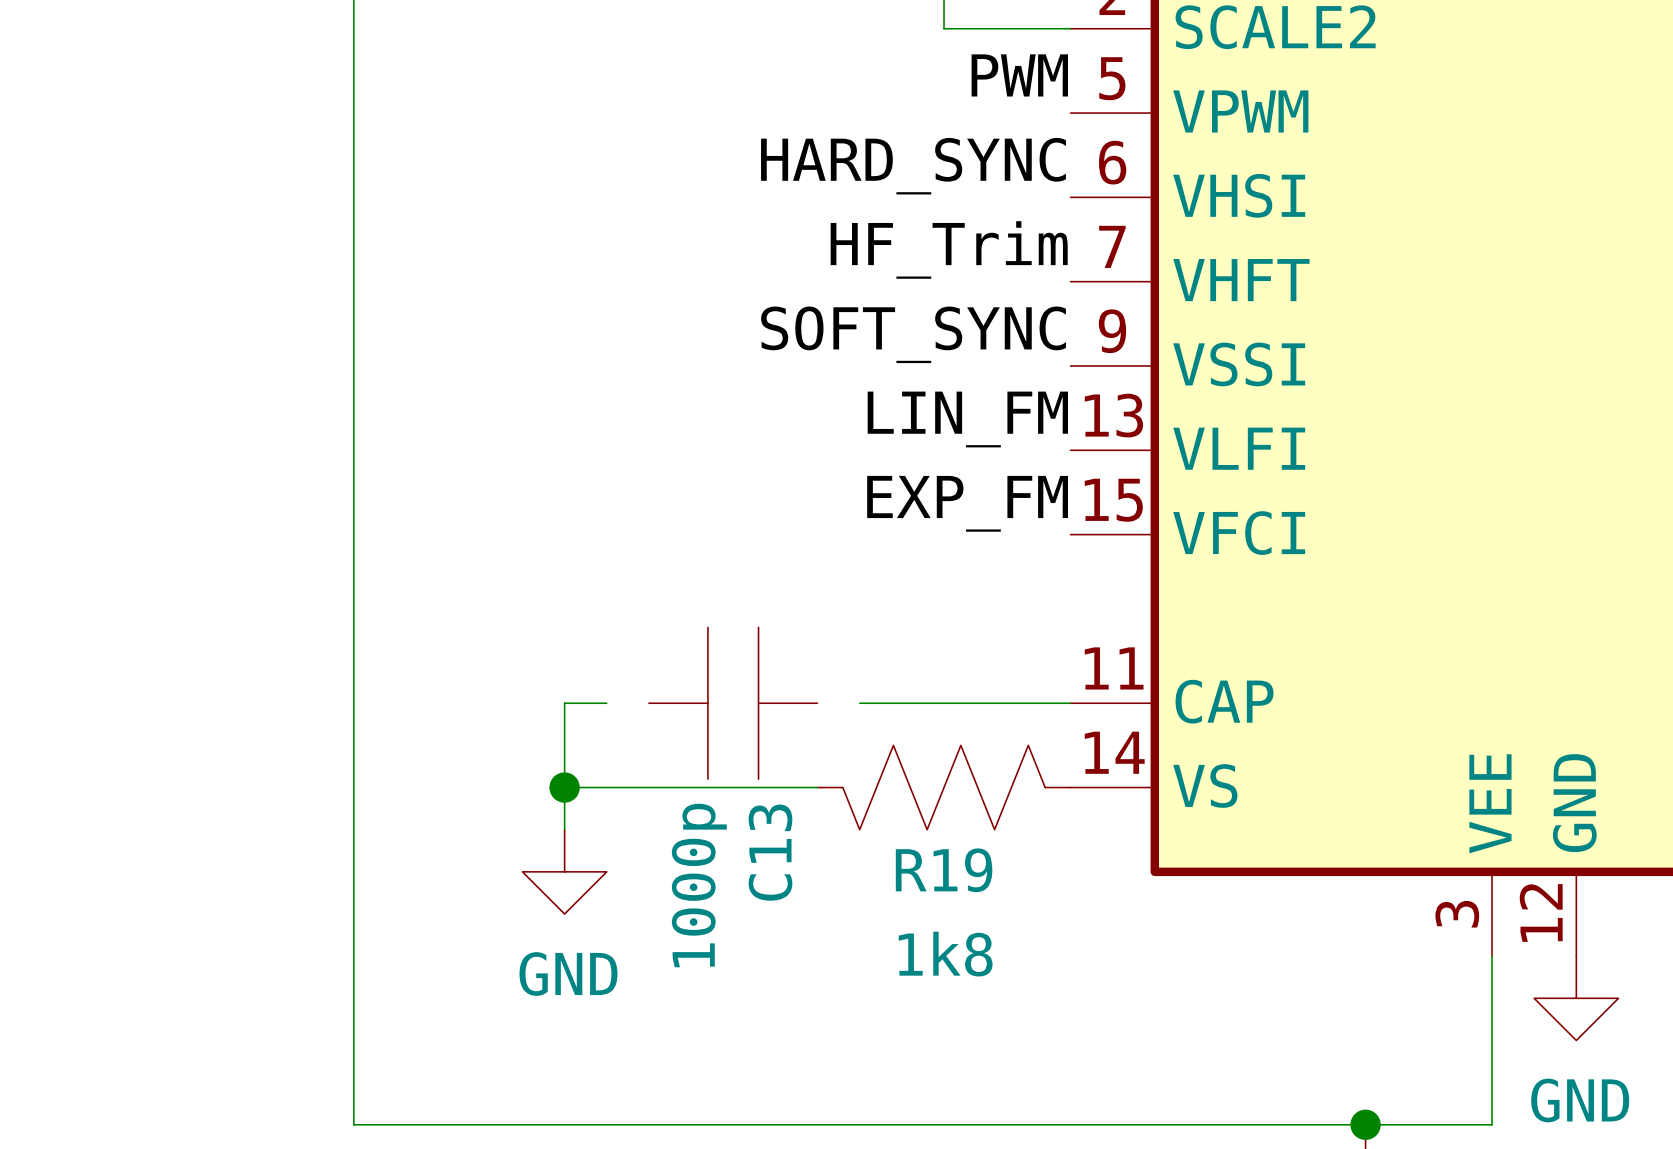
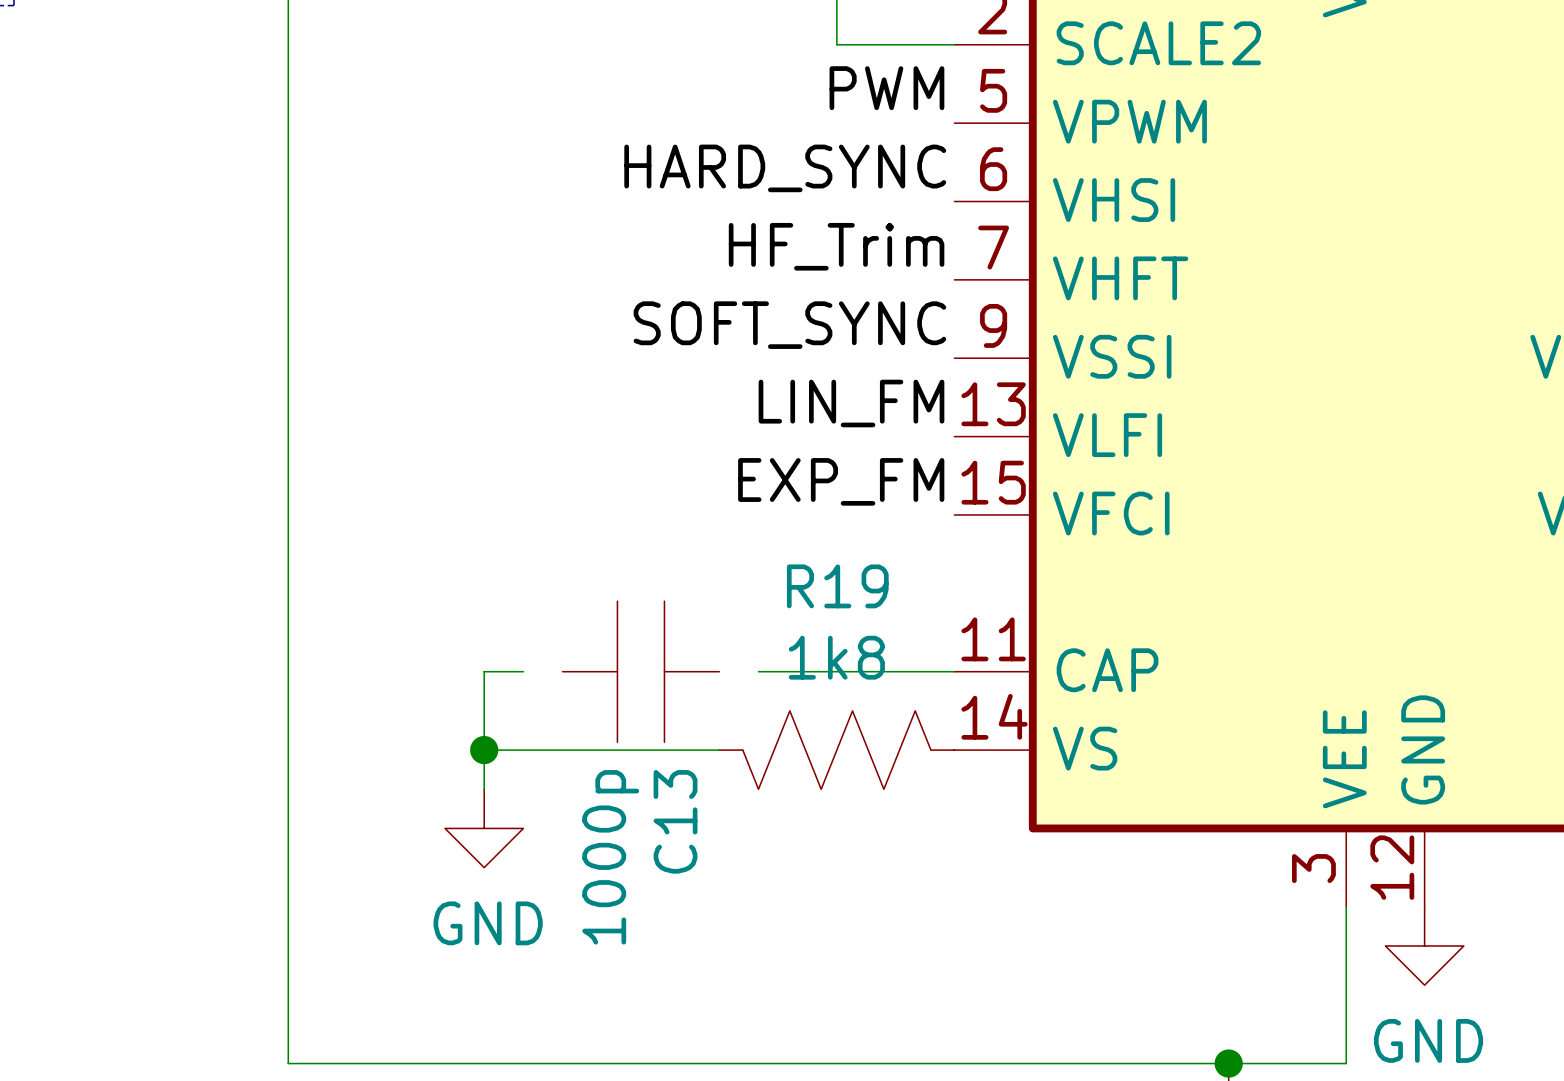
R19 name position: R19 (944, 870) -> R19 (837, 586)
R19 value position: 1k8 (945, 954) -> 1k8 (836, 657)

